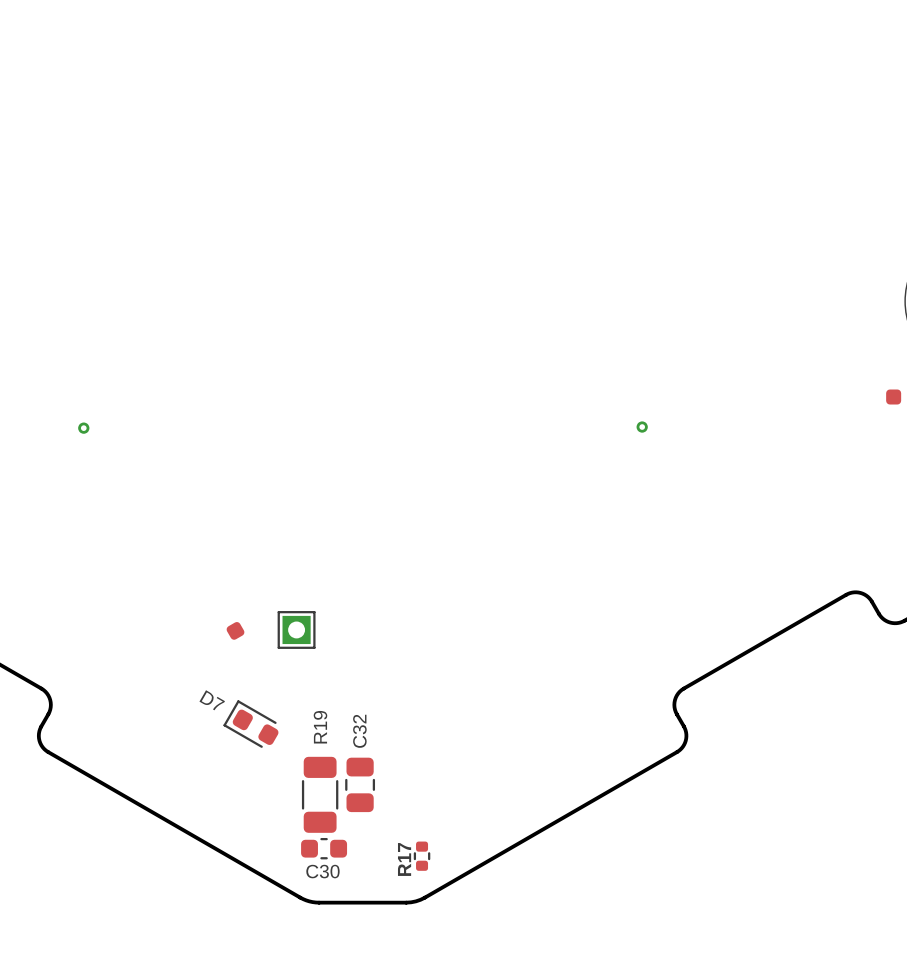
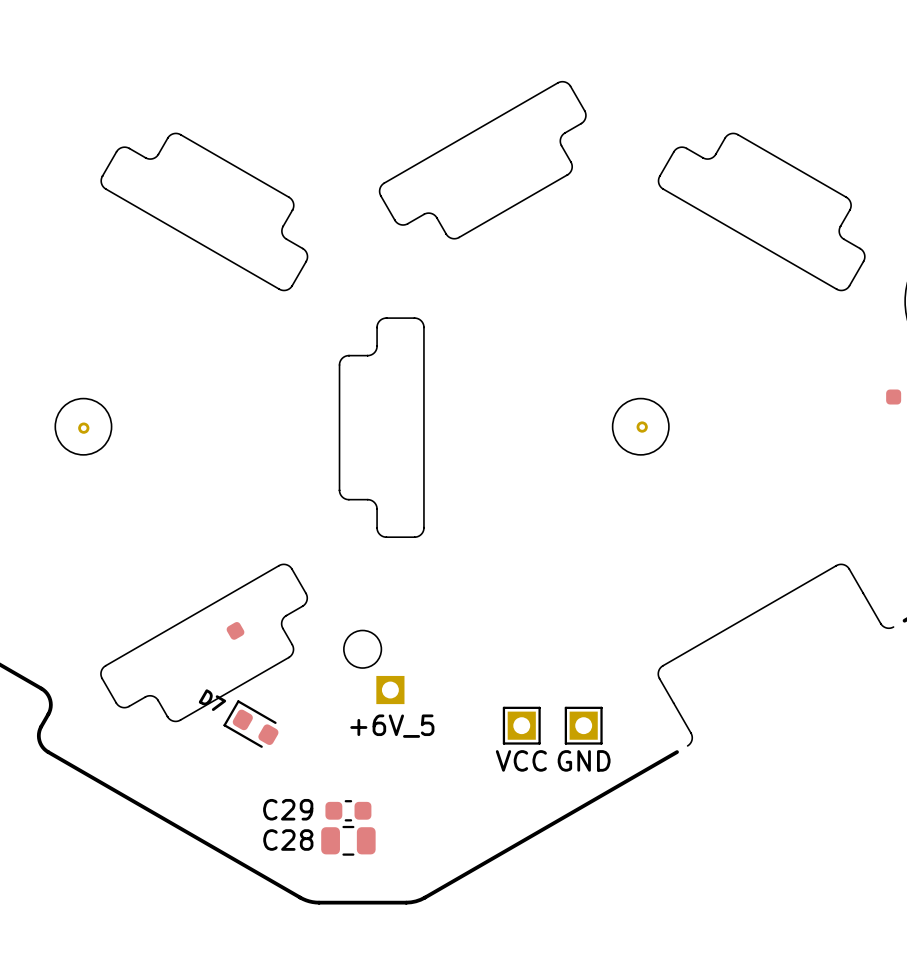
board edge: none -> (557, 82) (383, 183) (379, 188) (379, 193) (396, 222) (404, 224) (425, 213) (431, 213) (436, 216) (448, 236) (457, 238) (569, 173) (572, 164) (560, 144) (560, 138) (564, 133) (583, 122) (585, 114) (569, 85) (564, 82) (557, 82)
board edge: none -> (180, 134) (292, 200) (293, 208) (282, 227) (282, 233) (285, 238) (304, 249) (307, 257) (289, 288) (279, 289) (102, 186) (102, 177) (119, 148) (127, 147) (146, 158) (152, 158) (157, 155) (169, 135) (174, 133) (180, 134)
board edge: none -> (737, 134) (849, 199) (850, 207) (840, 227) (839, 233) (843, 238) (861, 249) (864, 257) (846, 288) (836, 289) (660, 186) (659, 177) (676, 148) (684, 147) (703, 158) (710, 158) (715, 155) (727, 135) (732, 133) (737, 134)
board edge: none -> (386, 318) (416, 318) (421, 321) (423, 326) (423, 527) (421, 533) (415, 537) (381, 535) (377, 529) (377, 508) (374, 502) (368, 499) (345, 499) (339, 491) (339, 362) (345, 356) (368, 355) (374, 352) (377, 347) (377, 324) (381, 319) (386, 318)
round board edge: none -> [54, 398, 113, 456]
round board edge: none -> [612, 398, 670, 456]
board edge: none -> (279, 565) (104, 666) (101, 676) (117, 704) (122, 707) (126, 707) (146, 696) (152, 696) (157, 699) (169, 719) (178, 720) (289, 656) (292, 652) (293, 646) (282, 627) (281, 621) (285, 616) (304, 605) (307, 597) (290, 567) (285, 564) (279, 565)
board edge: (904, 620) (894, 623) (884, 619) (869, 598) (862, 593) (854, 592) (846, 594) (679, 691) (675, 697) (674, 707) (684, 728) (686, 736) (684, 744) (677, 752) -> none
board edge: none -> (893, 627) (886, 627) (881, 624) (848, 567) (842, 564) (836, 565) (660, 667) (659, 677) (691, 734) (691, 740) (687, 745)
part side: top (296, 629) -> bottom (390, 690)
round board edge: none -> [343, 630, 382, 669]
part: none -> (521, 725)
part: none -> (583, 725)
text: none -> +6V_5 (392, 726)
text: none -> VCC (521, 760)
text: none -> GND (584, 760)
C32: (360, 784) -> none
R19: (320, 794) -> none
C29: none -> (348, 810)
C28: none -> (348, 840)
C30: (324, 848) -> none
R17: (422, 856) -> none

